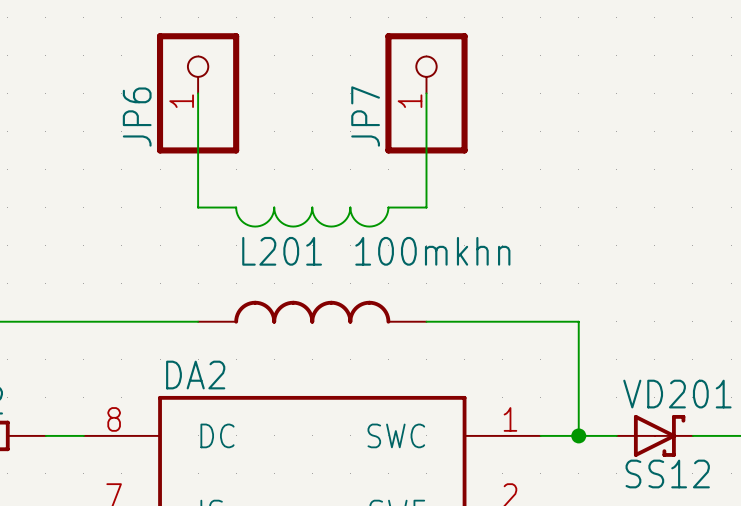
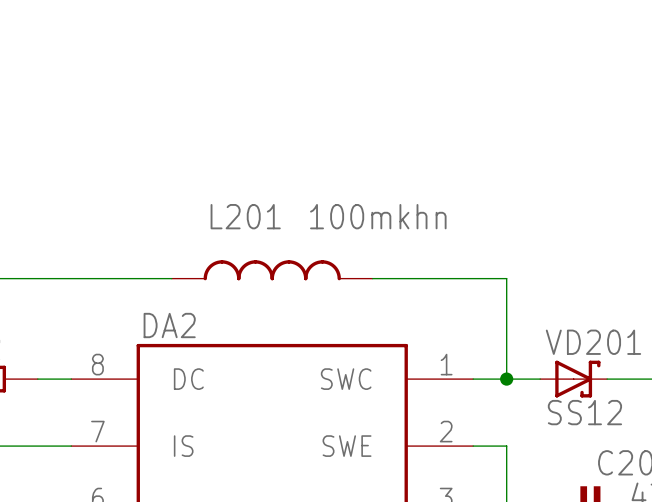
wire: (198, 93) (198, 207) (236, 207) (241, 220) (255, 226) (268, 220) (274, 207) (279, 220) (293, 226) (306, 220) (312, 207) (316, 219) (326, 225) (333, 226) (342, 222) (348, 214) (350, 207) (355, 220) (369, 226) (382, 220) (388, 207) (426, 207) (426, 93) -> none
JP6: (198, 93) -> none
JP7: (426, 93) -> none

